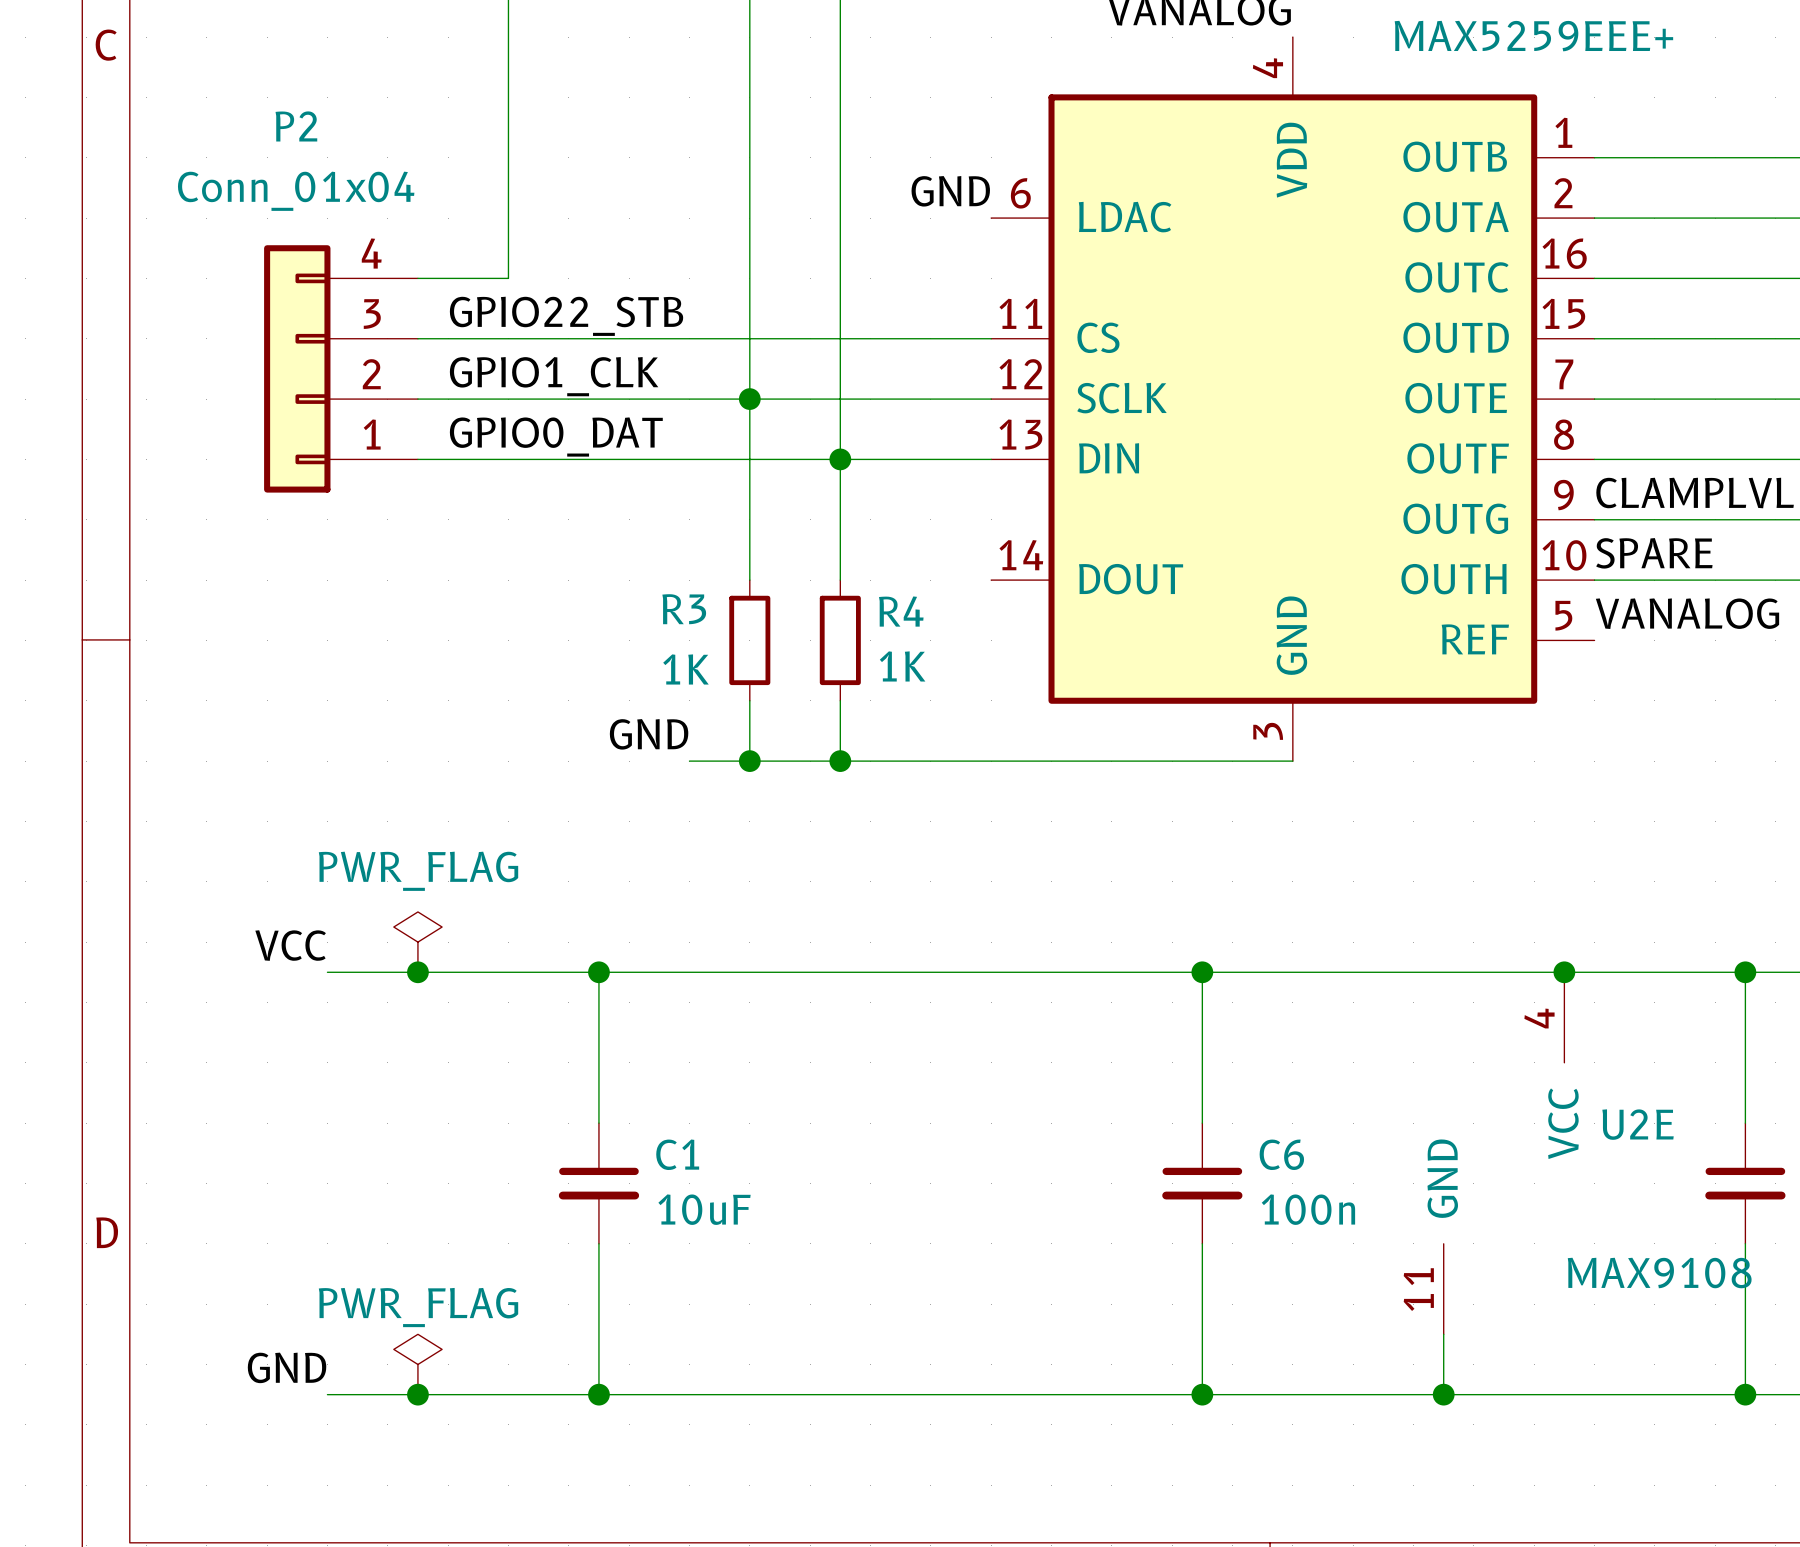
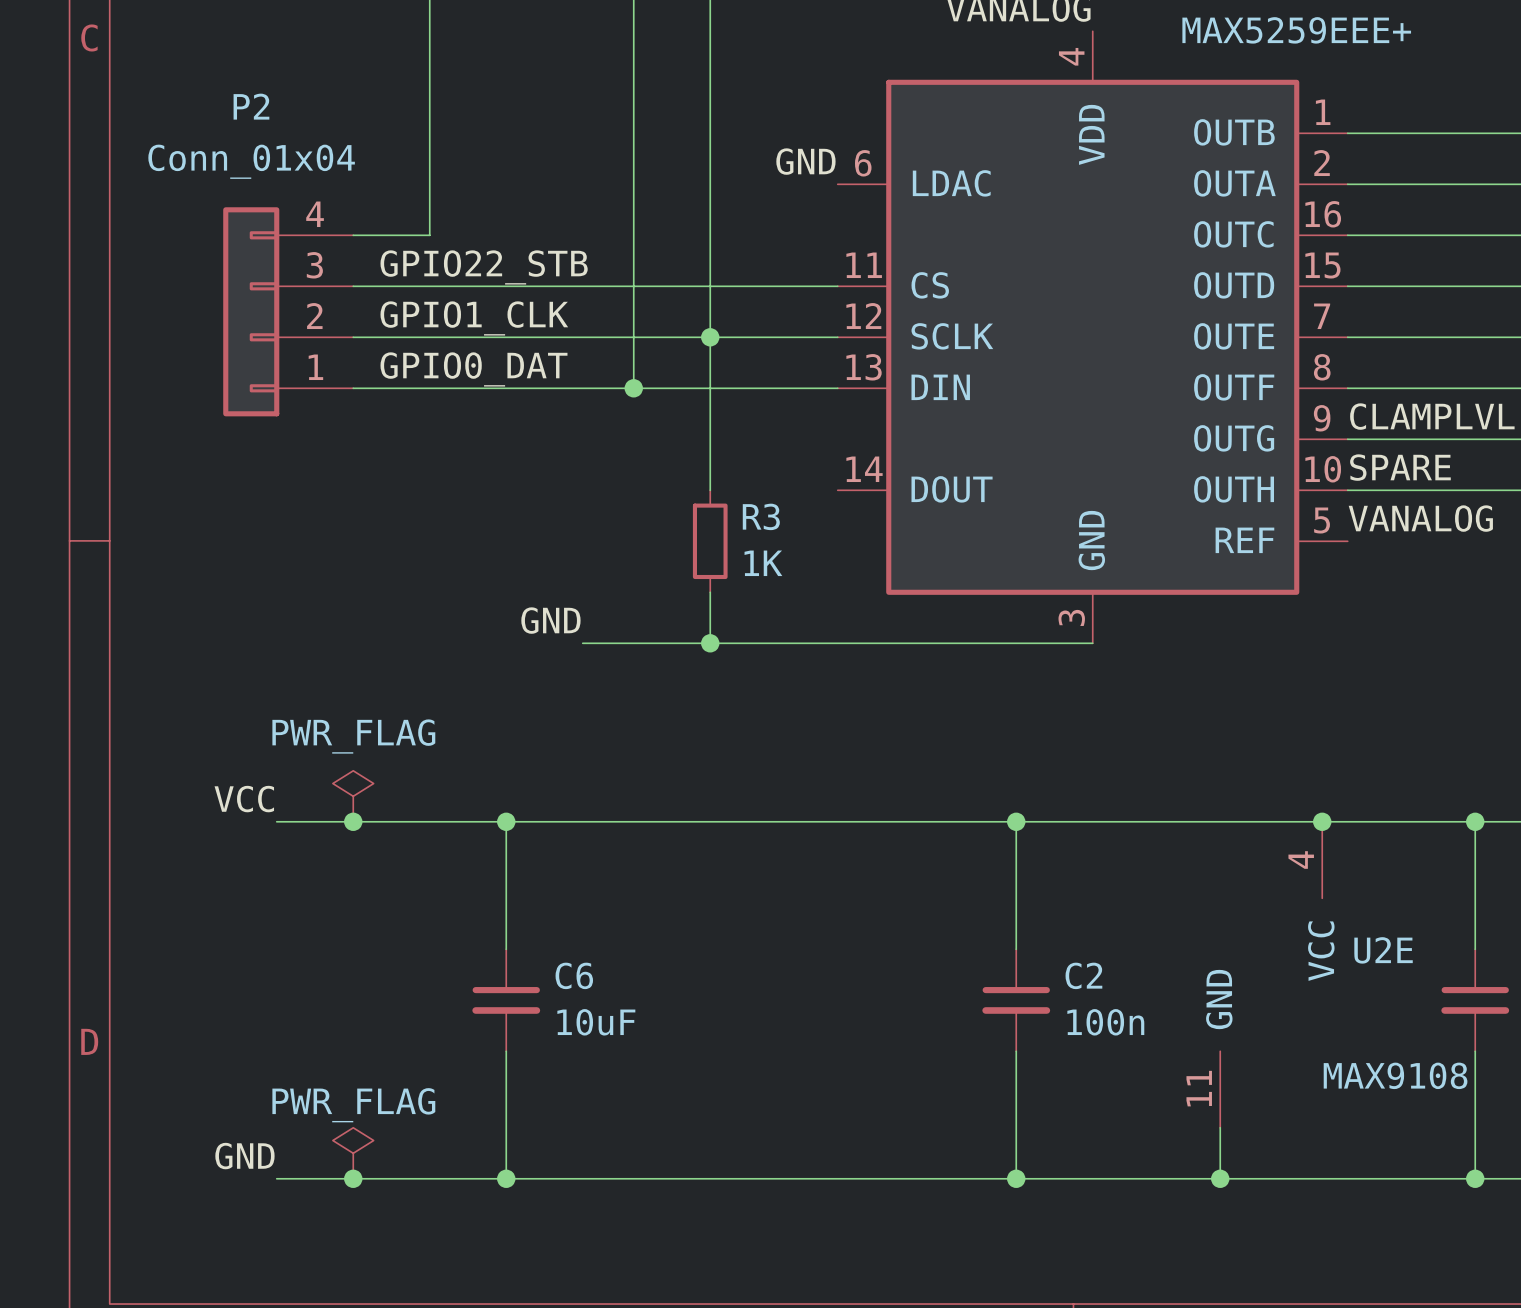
junction: (749, 399) -> none
junction: none -> (710, 337)
wire: (749, 459) (749, 580) -> none
junction: none -> (633, 388)
junction: (840, 459) -> none
R4 name: R4 (901, 611) -> R3 (761, 516)
R3: 1K (749, 640) -> none
wire: (749, 700) (749, 761) -> none
junction: (749, 761) -> none
C1 name: C1 (677, 1154) -> C6 (574, 975)
C6 name: C6 (1281, 1154) -> C2 (1083, 975)

